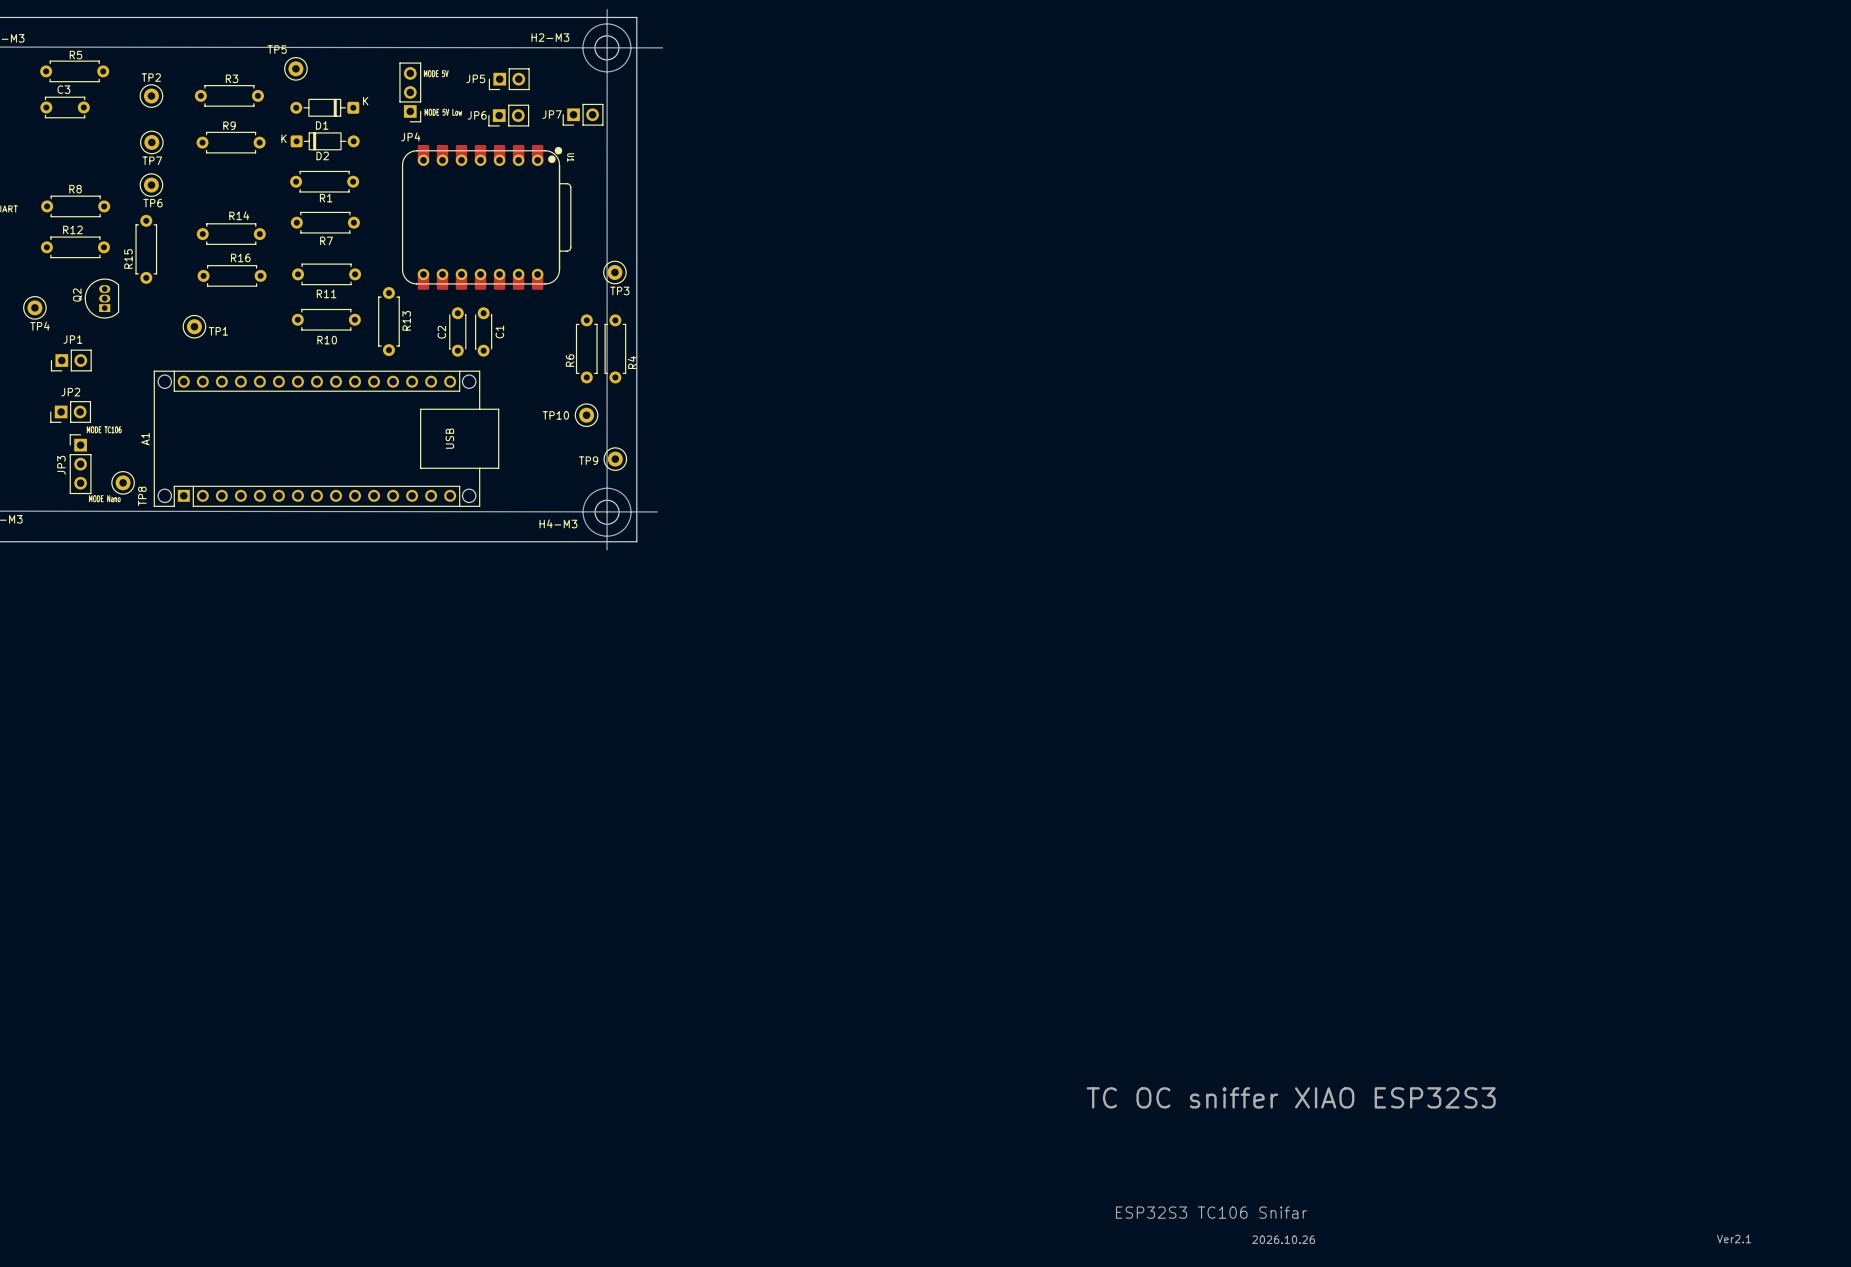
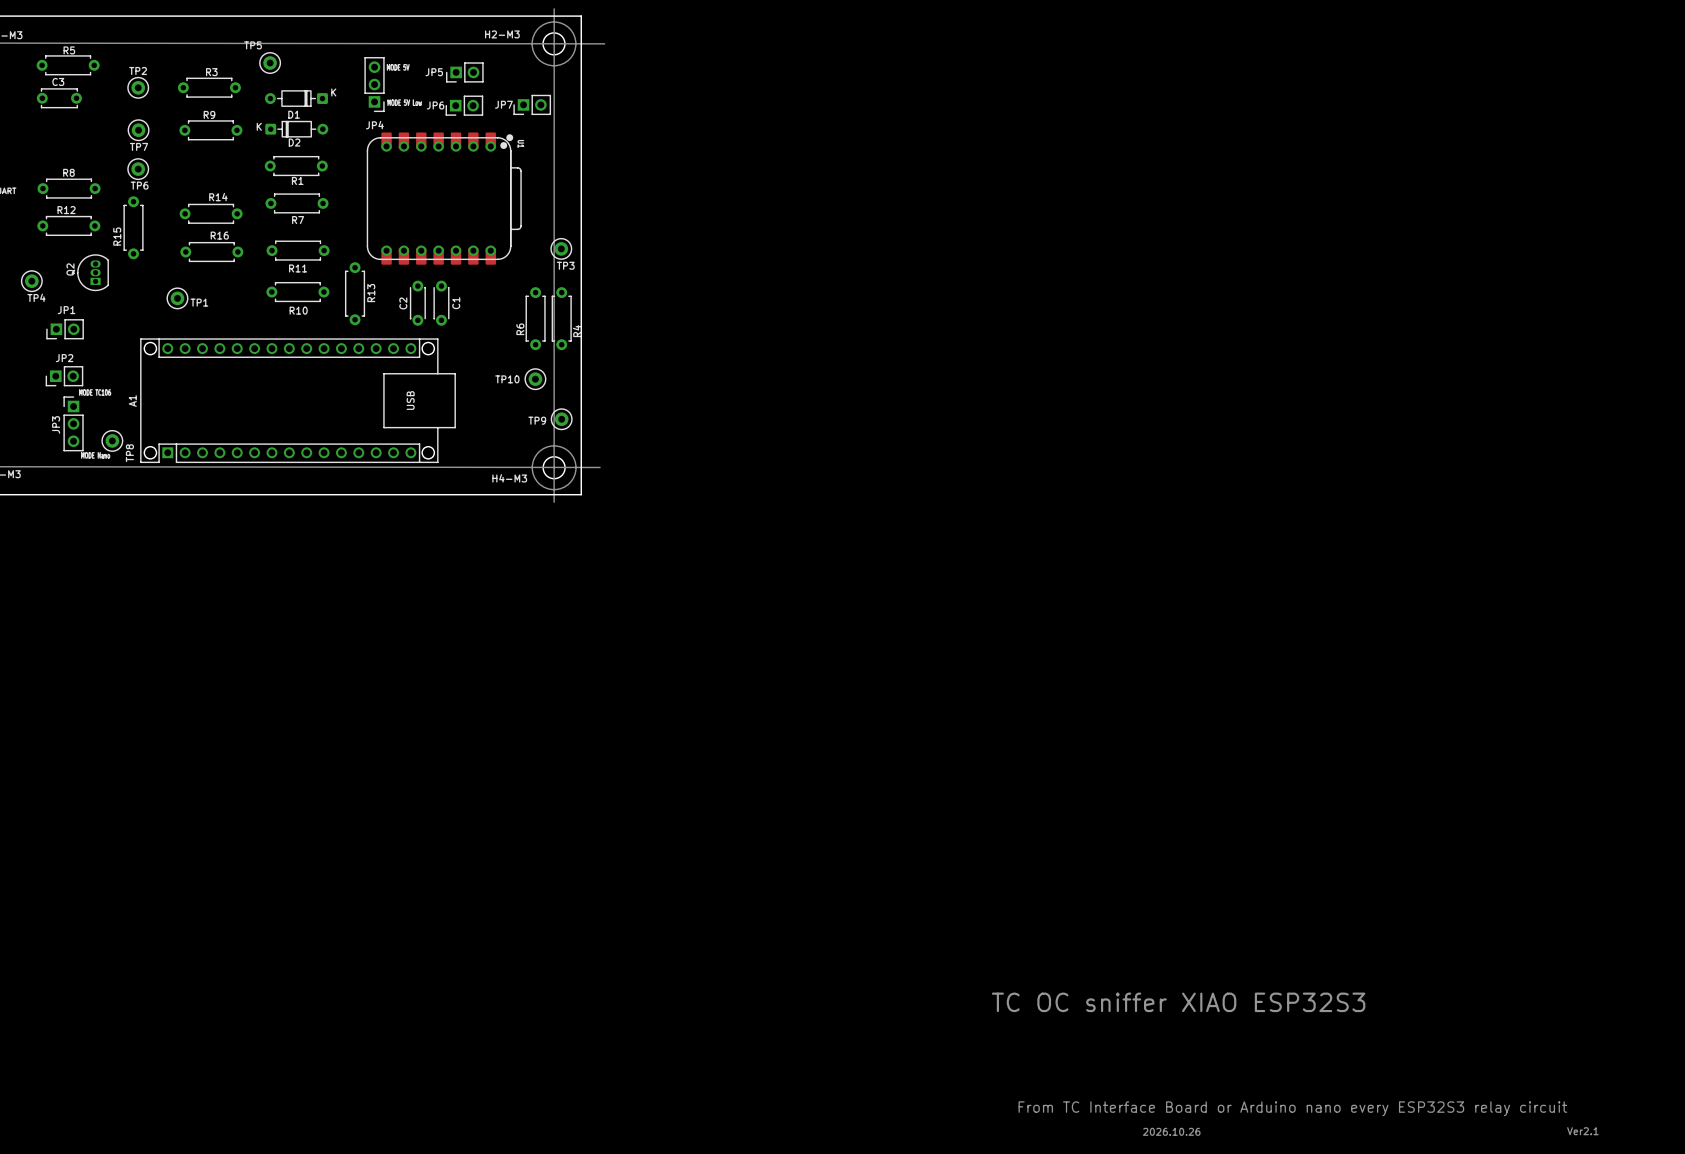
text: ESP32S3 TC106 Snifar (1211, 1212) -> From TC Interface Board or Arduino nano every ESP32S3 relay circuit (1292, 1108)

